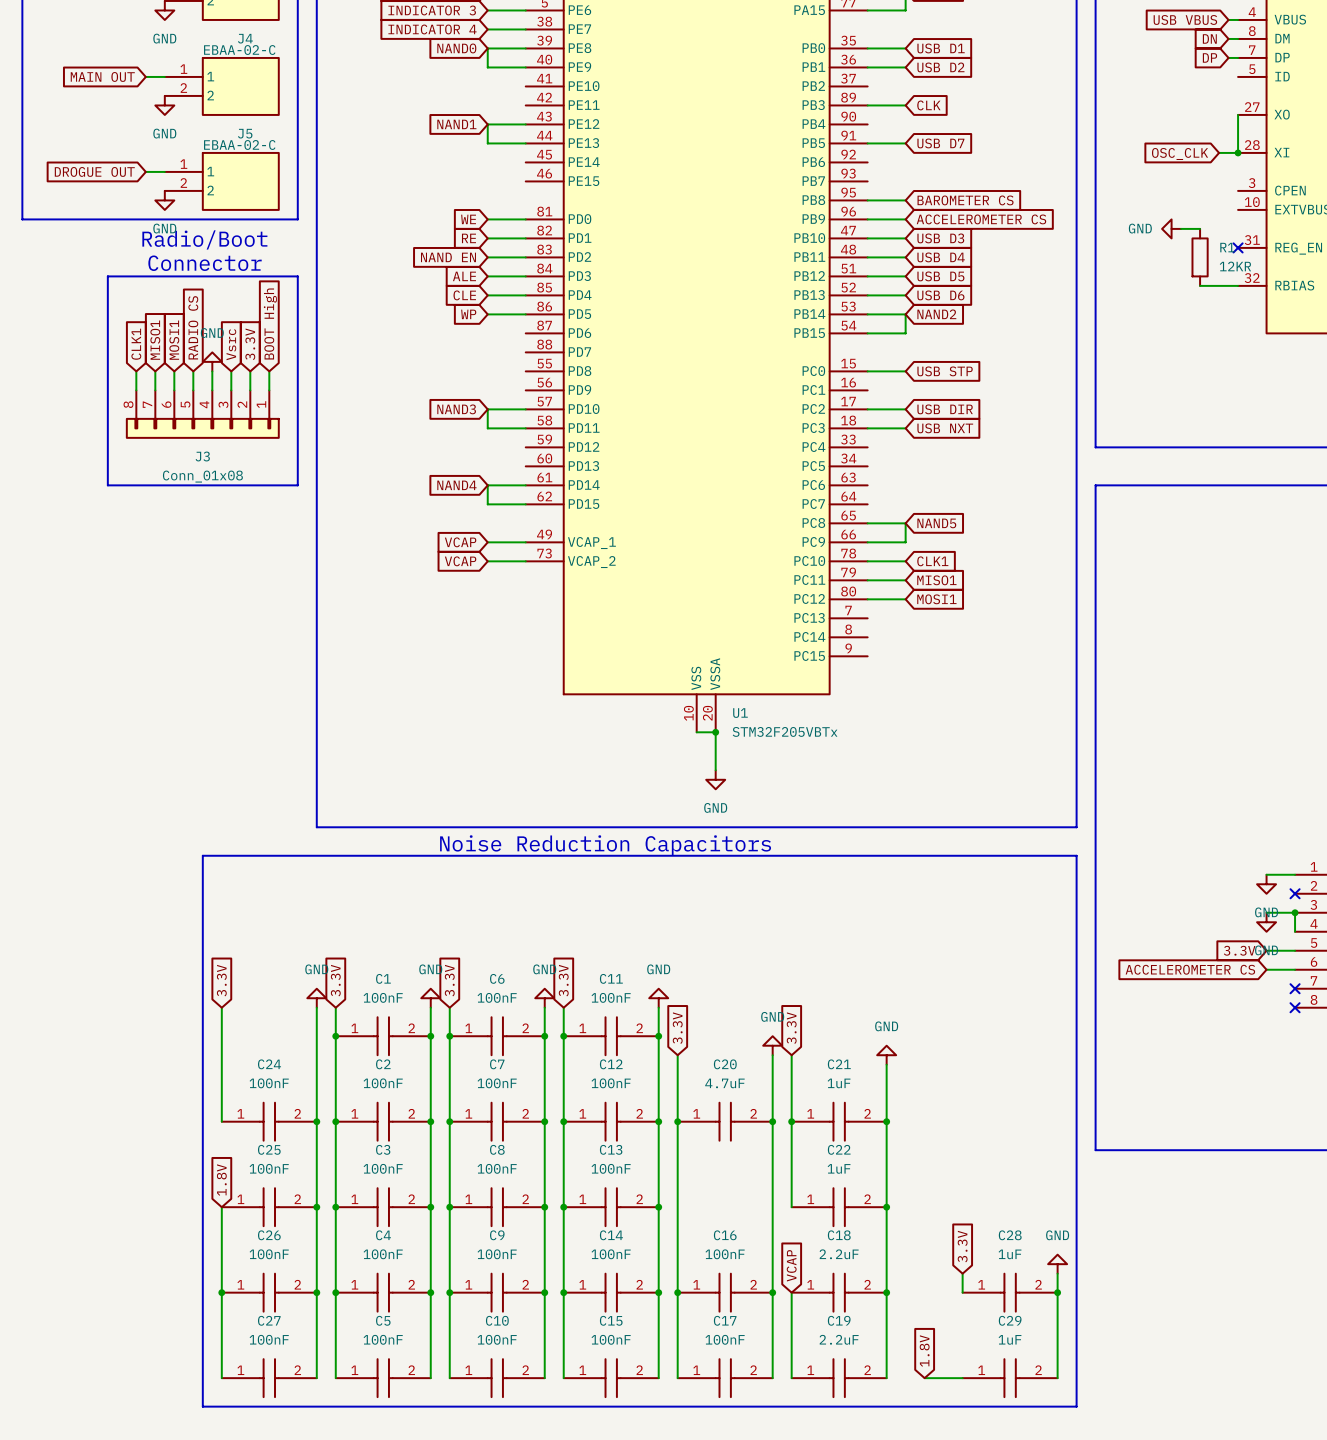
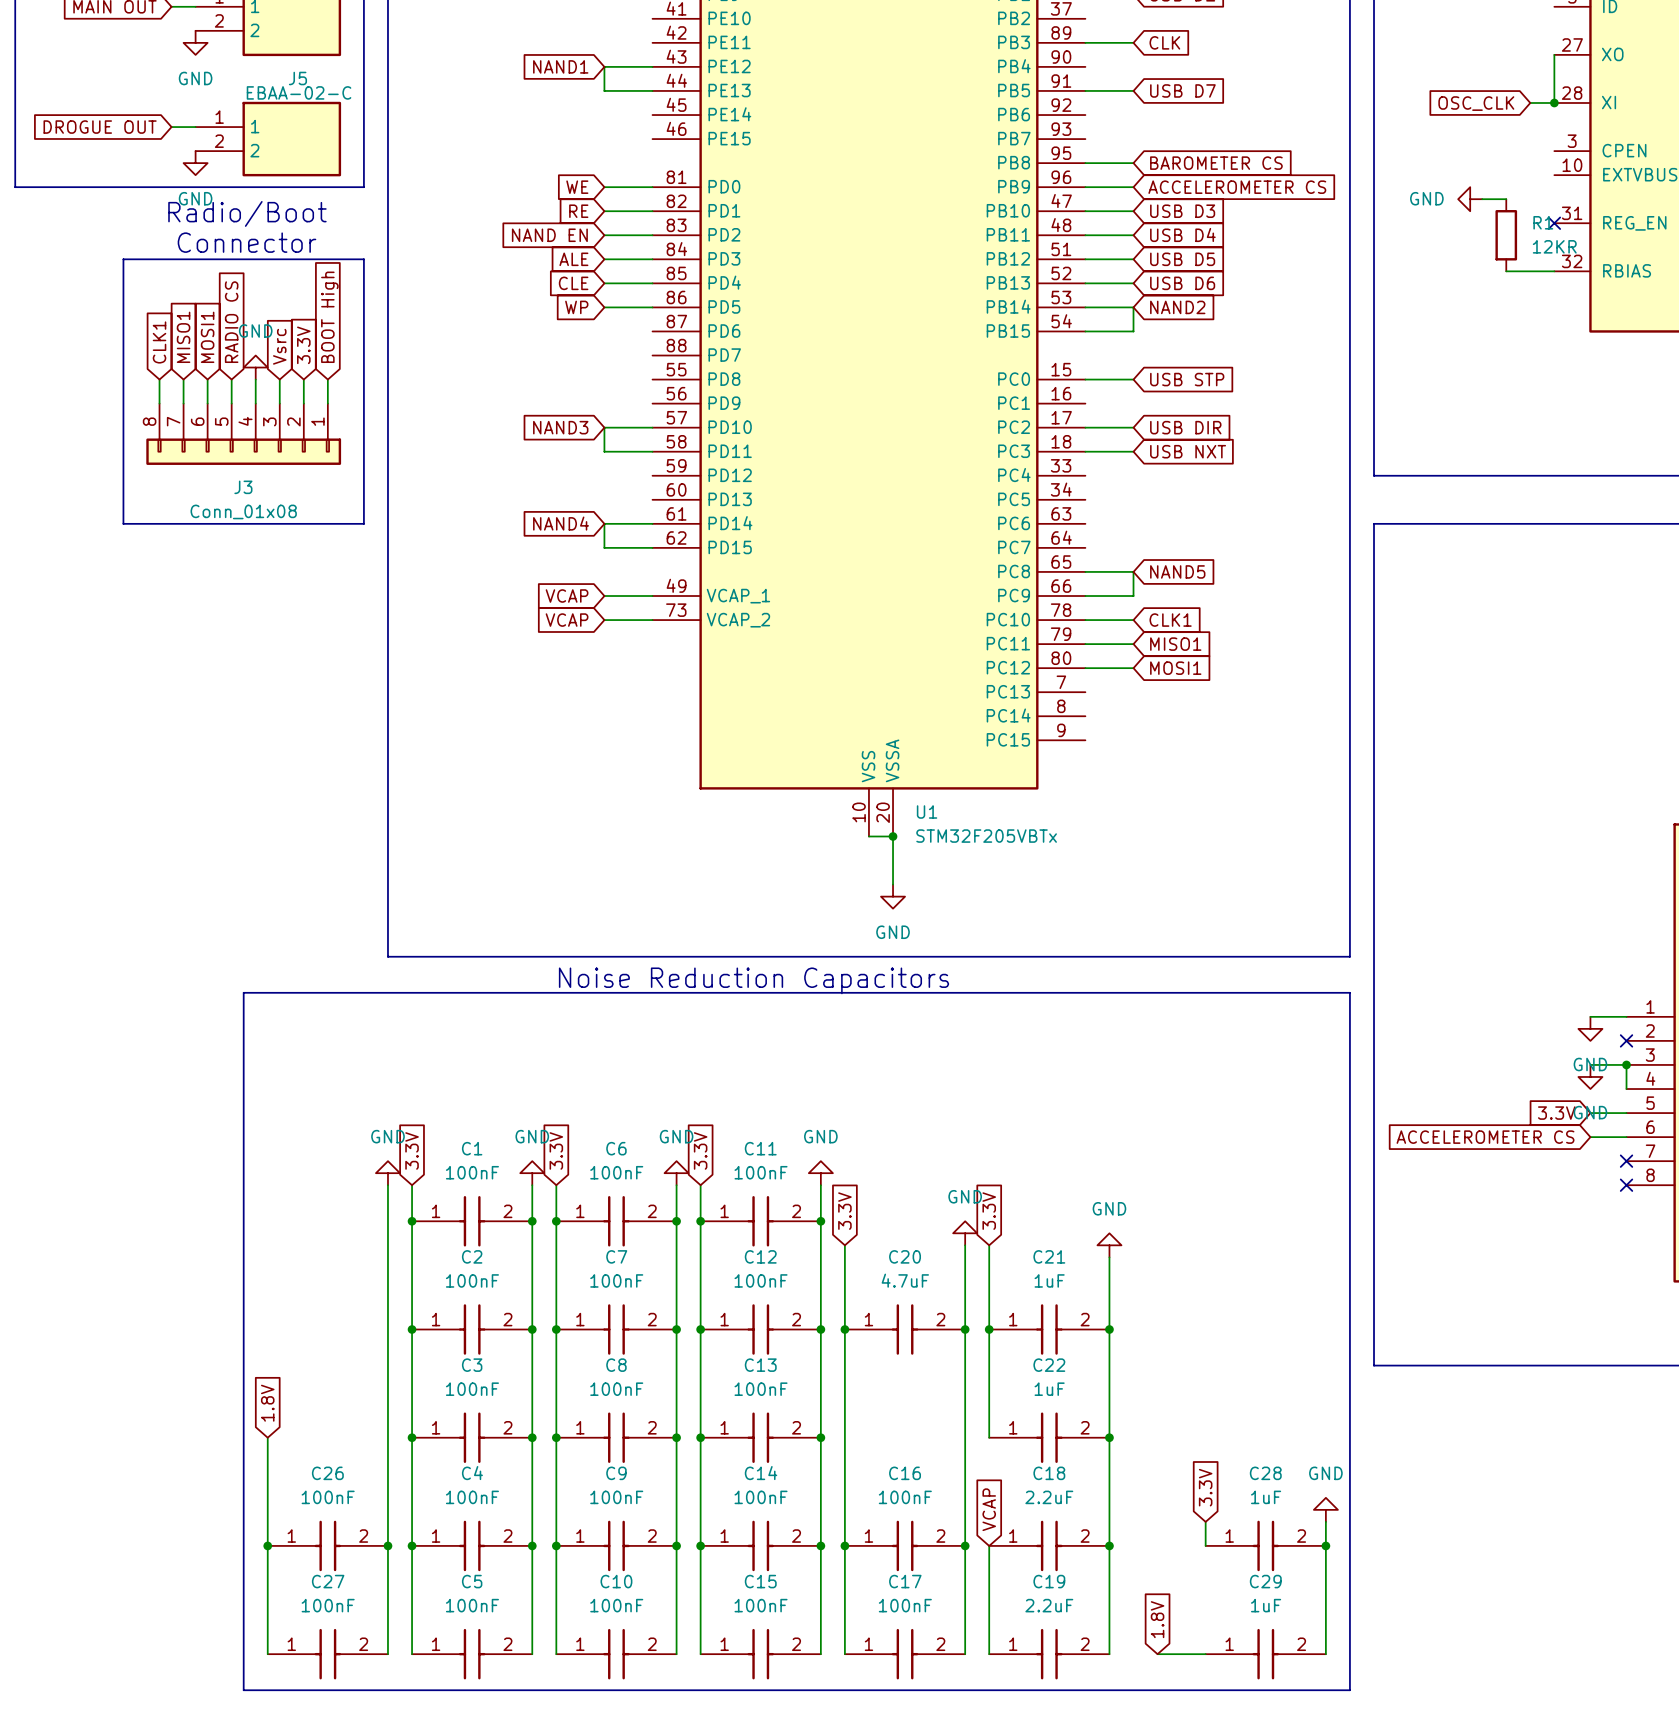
global label: 3.3V (221, 980) -> none
wire: (221, 1007) (221, 1121) -> none
C24: 100nF (269, 1121) -> none
junction: (316, 1121) -> none
C25: 100nF (269, 1207) -> none
junction: (316, 1207) -> none

